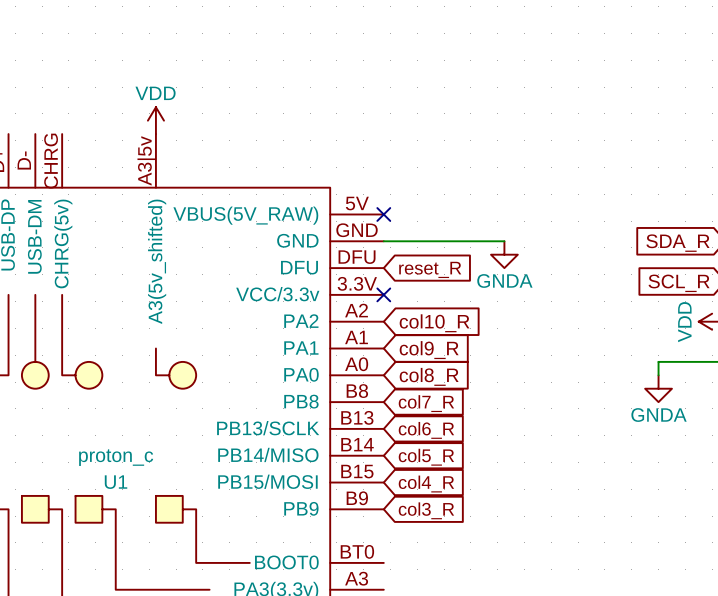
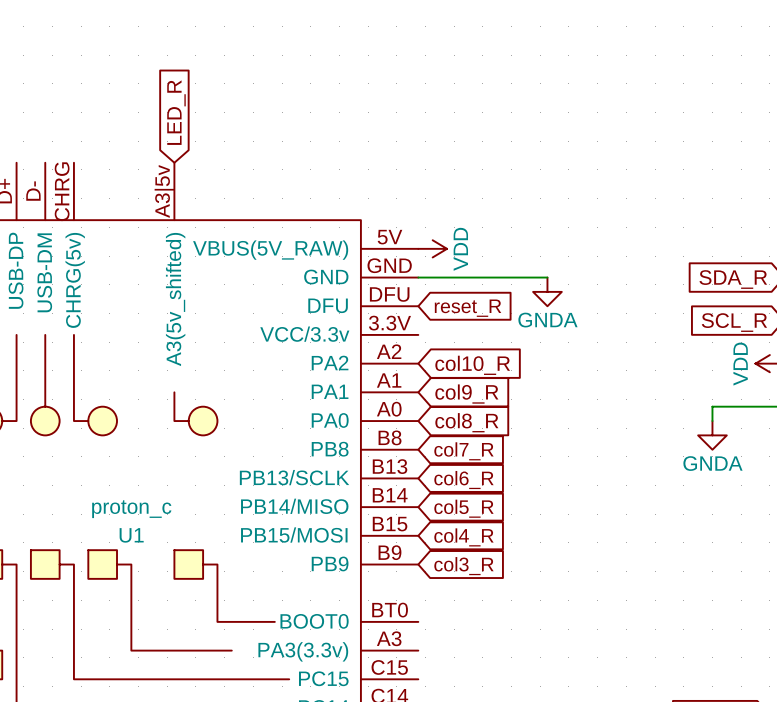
global label: none -> LED_R (176, 112)
power symbol rotation: 0° (155, 120) -> 90° clockwise (432, 248)
power symbol position: VDD (155, 120) -> VDD (432, 248)
no-connect mark: (383, 214) -> none
no-connect mark: (383, 294) -> none

